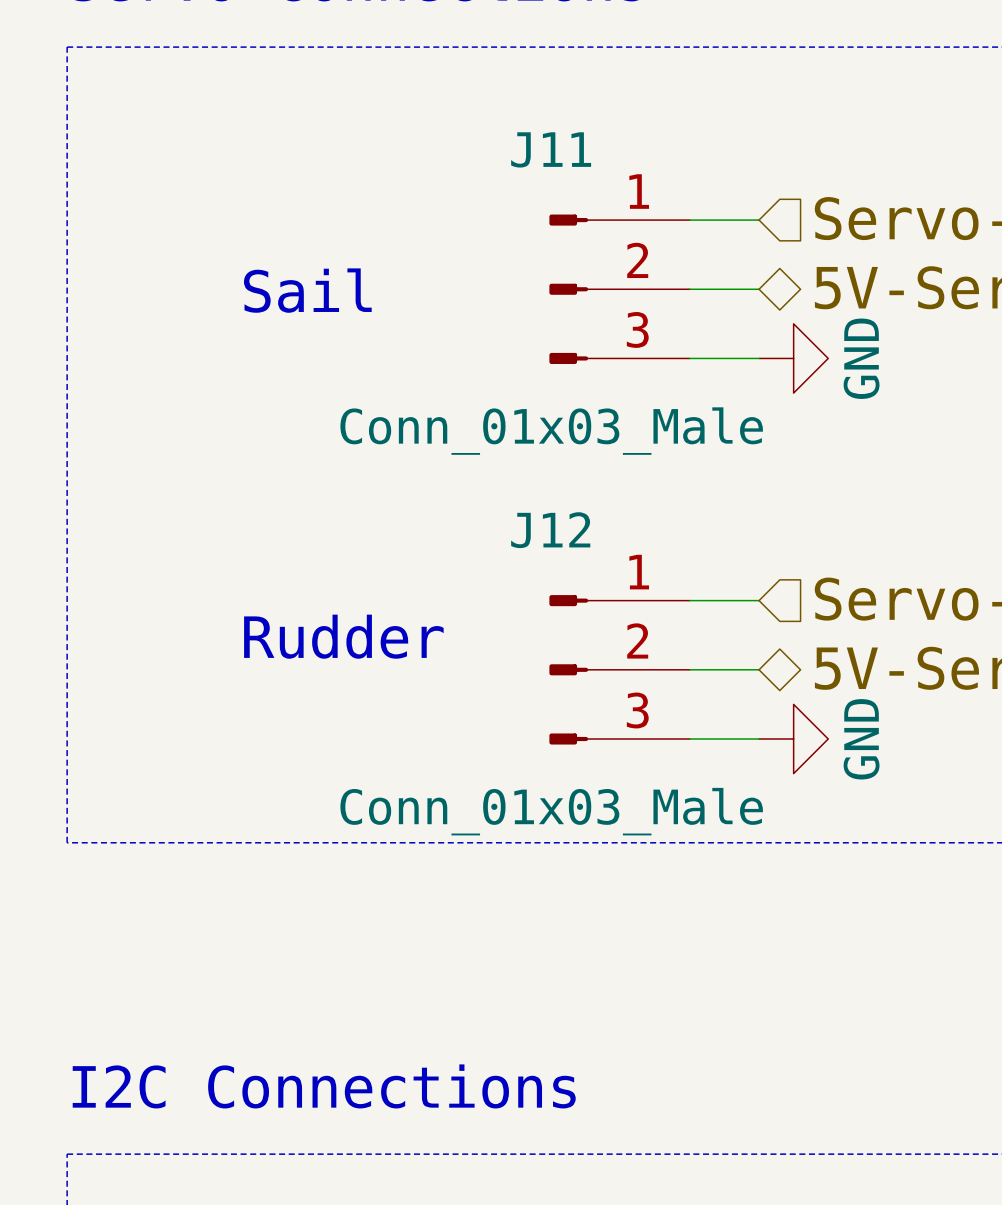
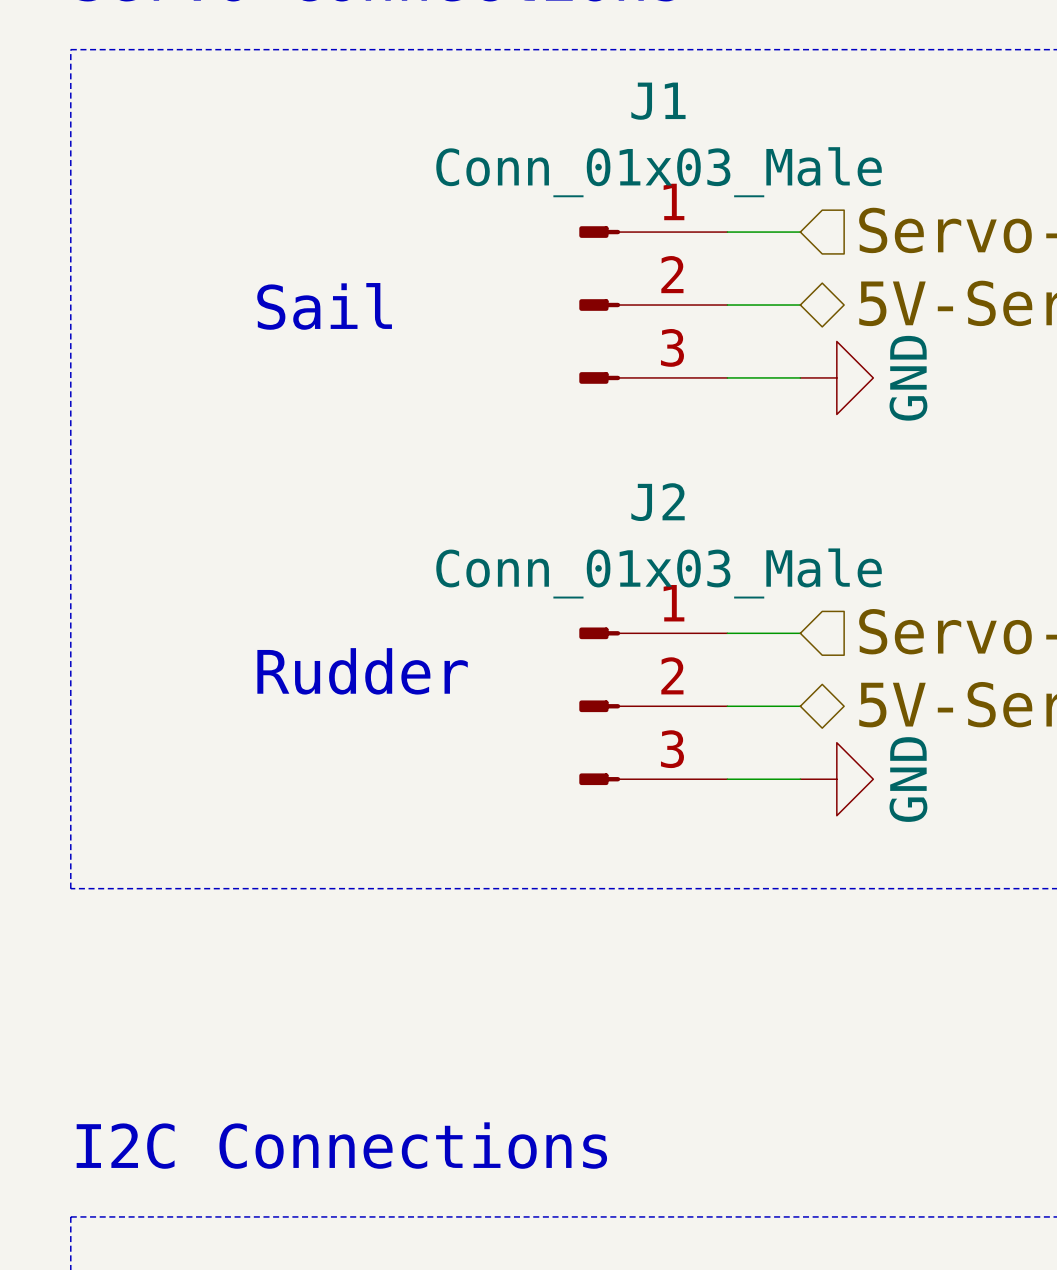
J11 name: J11 (551, 149) -> J1 (658, 101)
J11 value position: Conn_01x03_Male (551, 431) -> Conn_01x03_Male (659, 172)
J12 name: J12 (550, 530) -> J2 (658, 502)
J12 value position: Conn_01x03_Male (551, 811) -> Conn_01x03_Male (659, 573)

